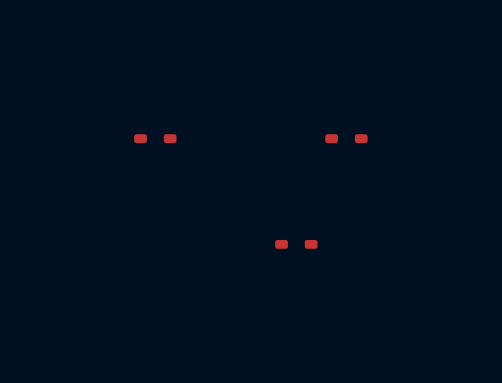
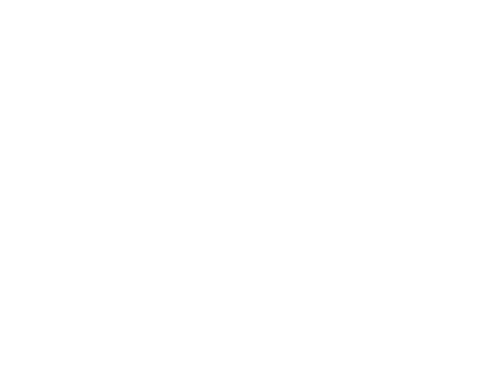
part: (155, 138) -> none
part: (346, 138) -> none
part: (296, 244) -> none

